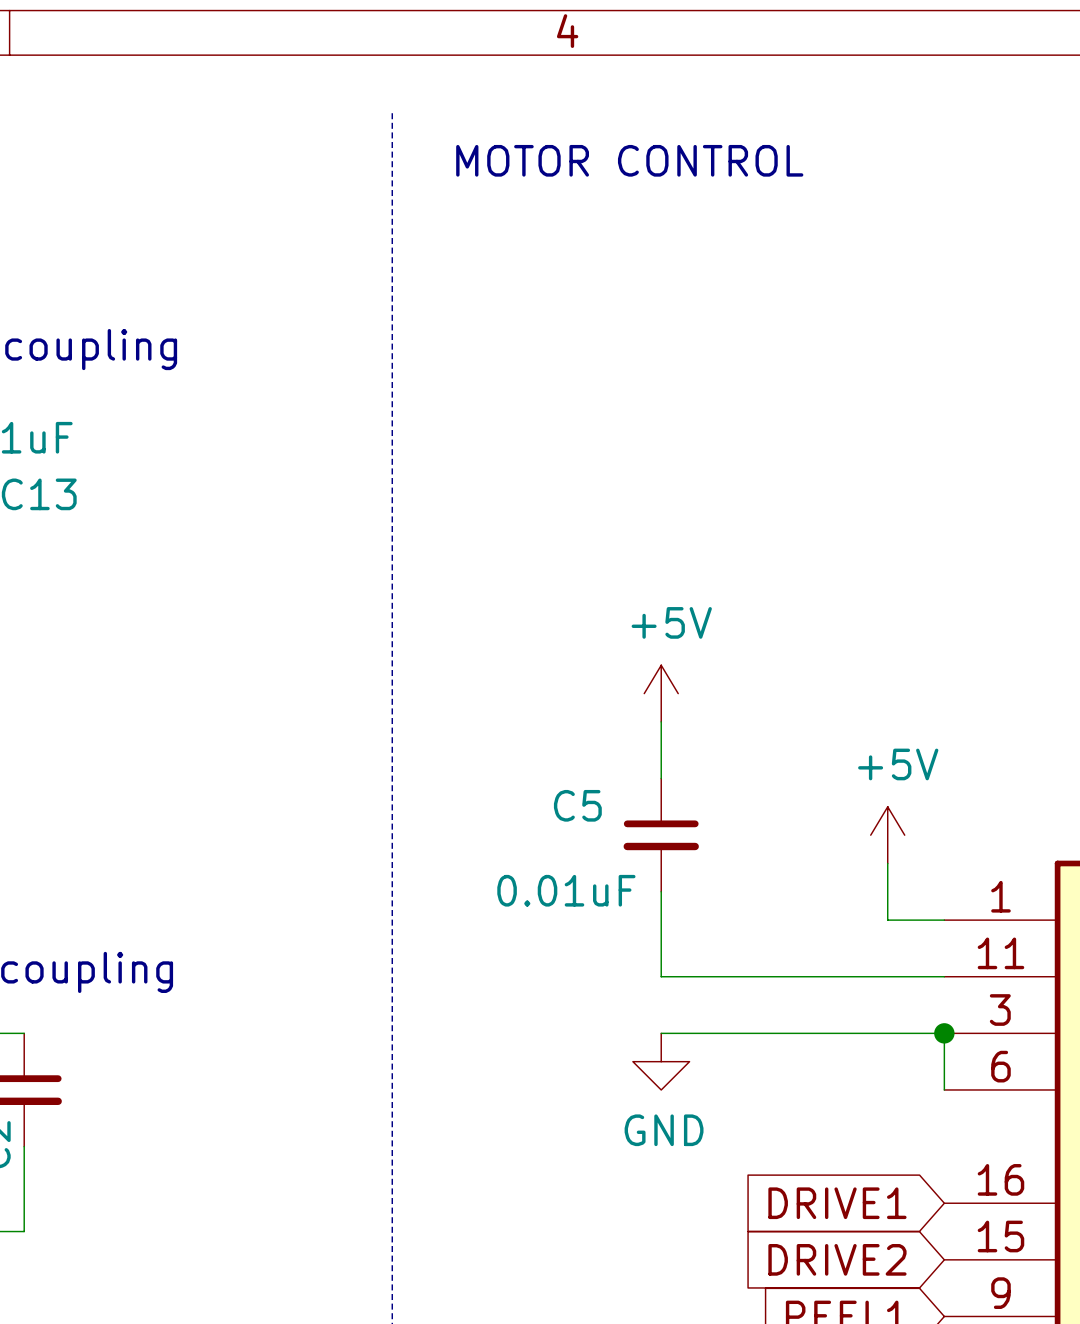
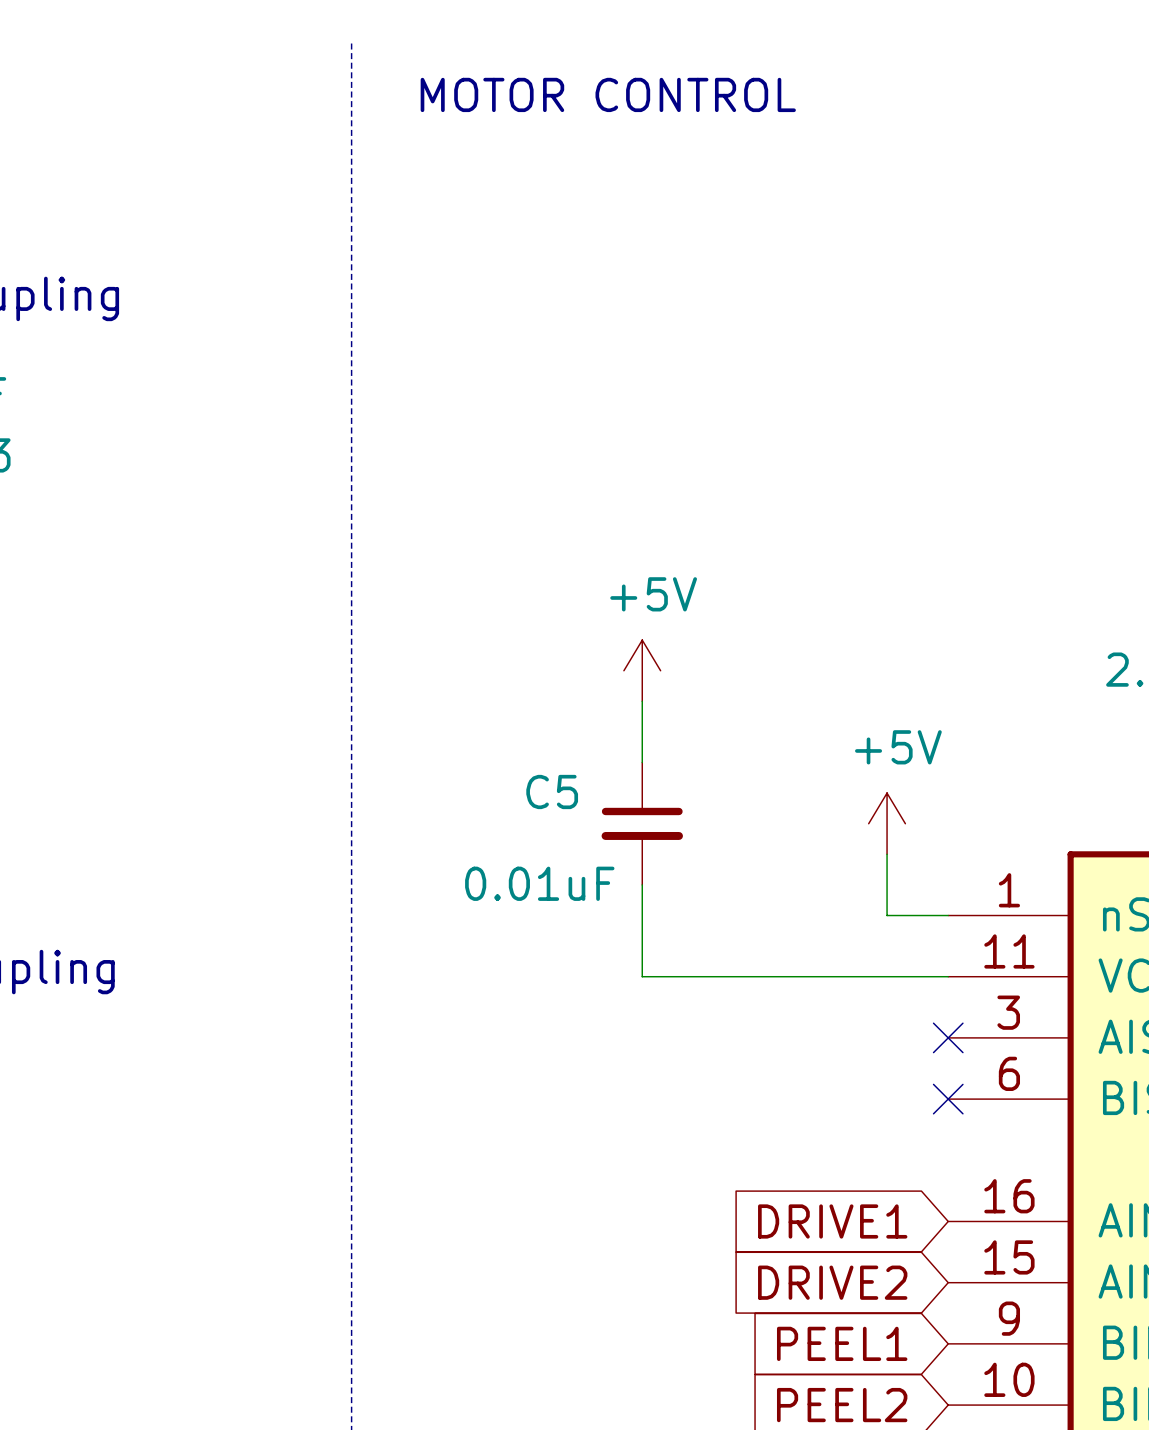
wire: (661, 1033) (944, 1033) (944, 1089) -> none
junction: (944, 1033) -> none
no-connect mark: none -> (948, 1037)
power symbol: GND (661, 1061) -> none
no-connect mark: none -> (948, 1099)

